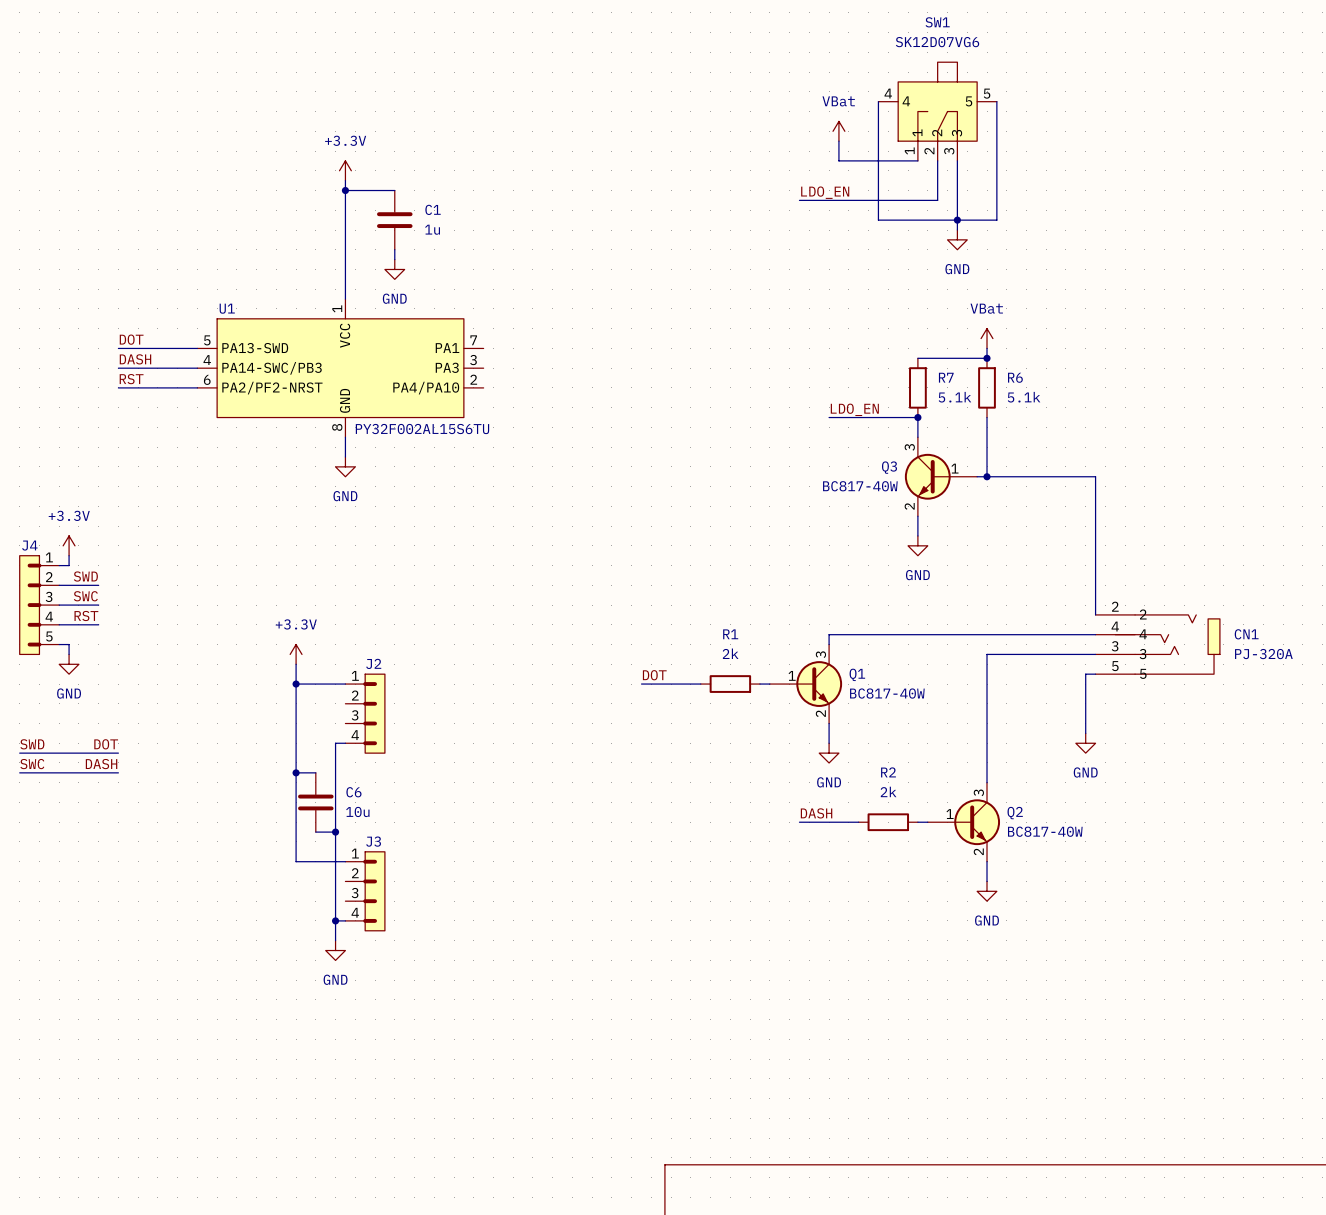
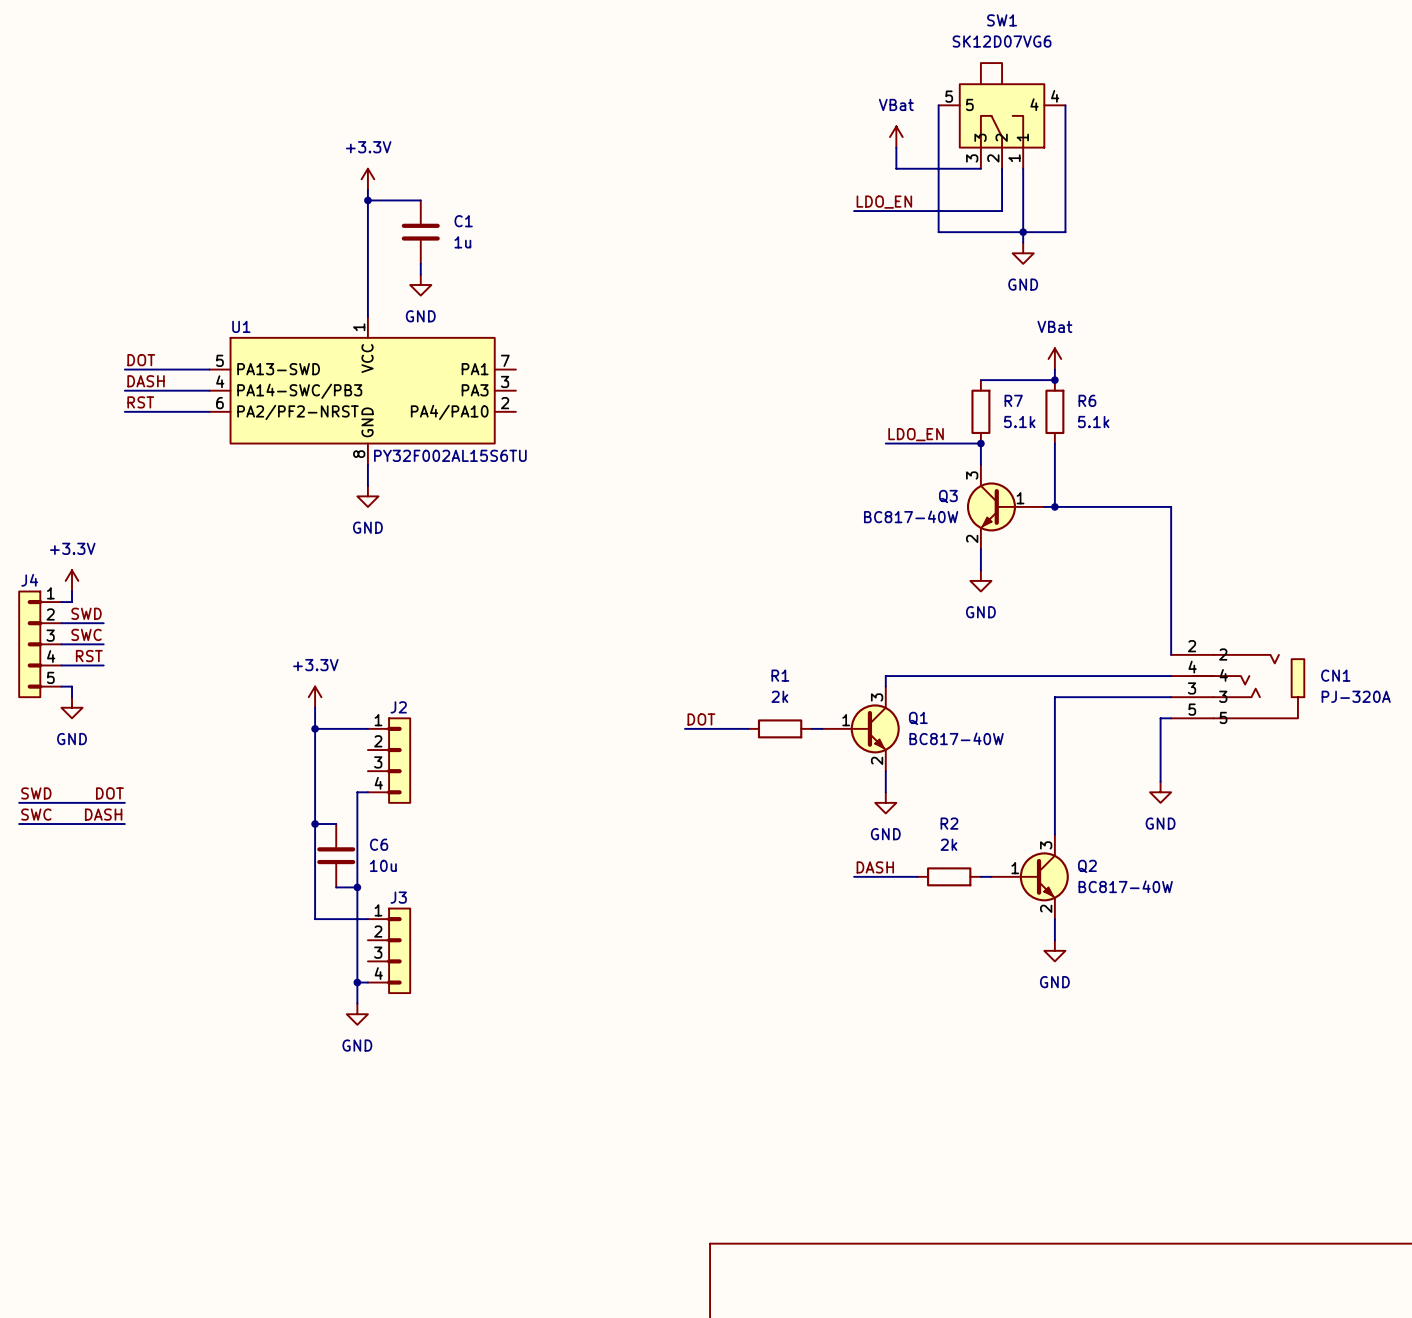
SW1 flip: as is (937, 101) -> left-right (1002, 105)

